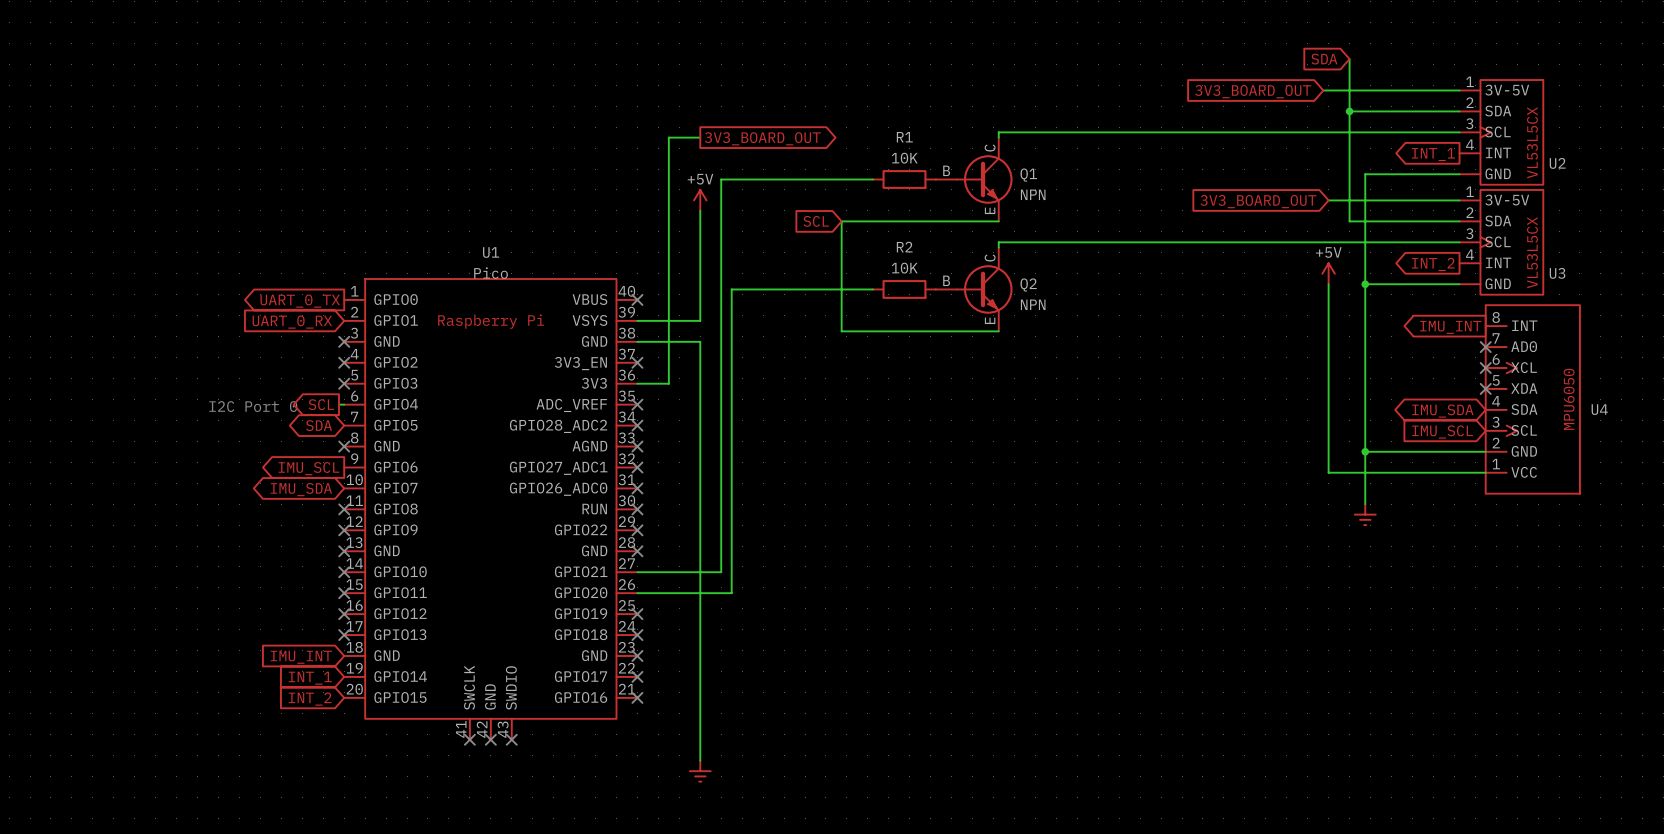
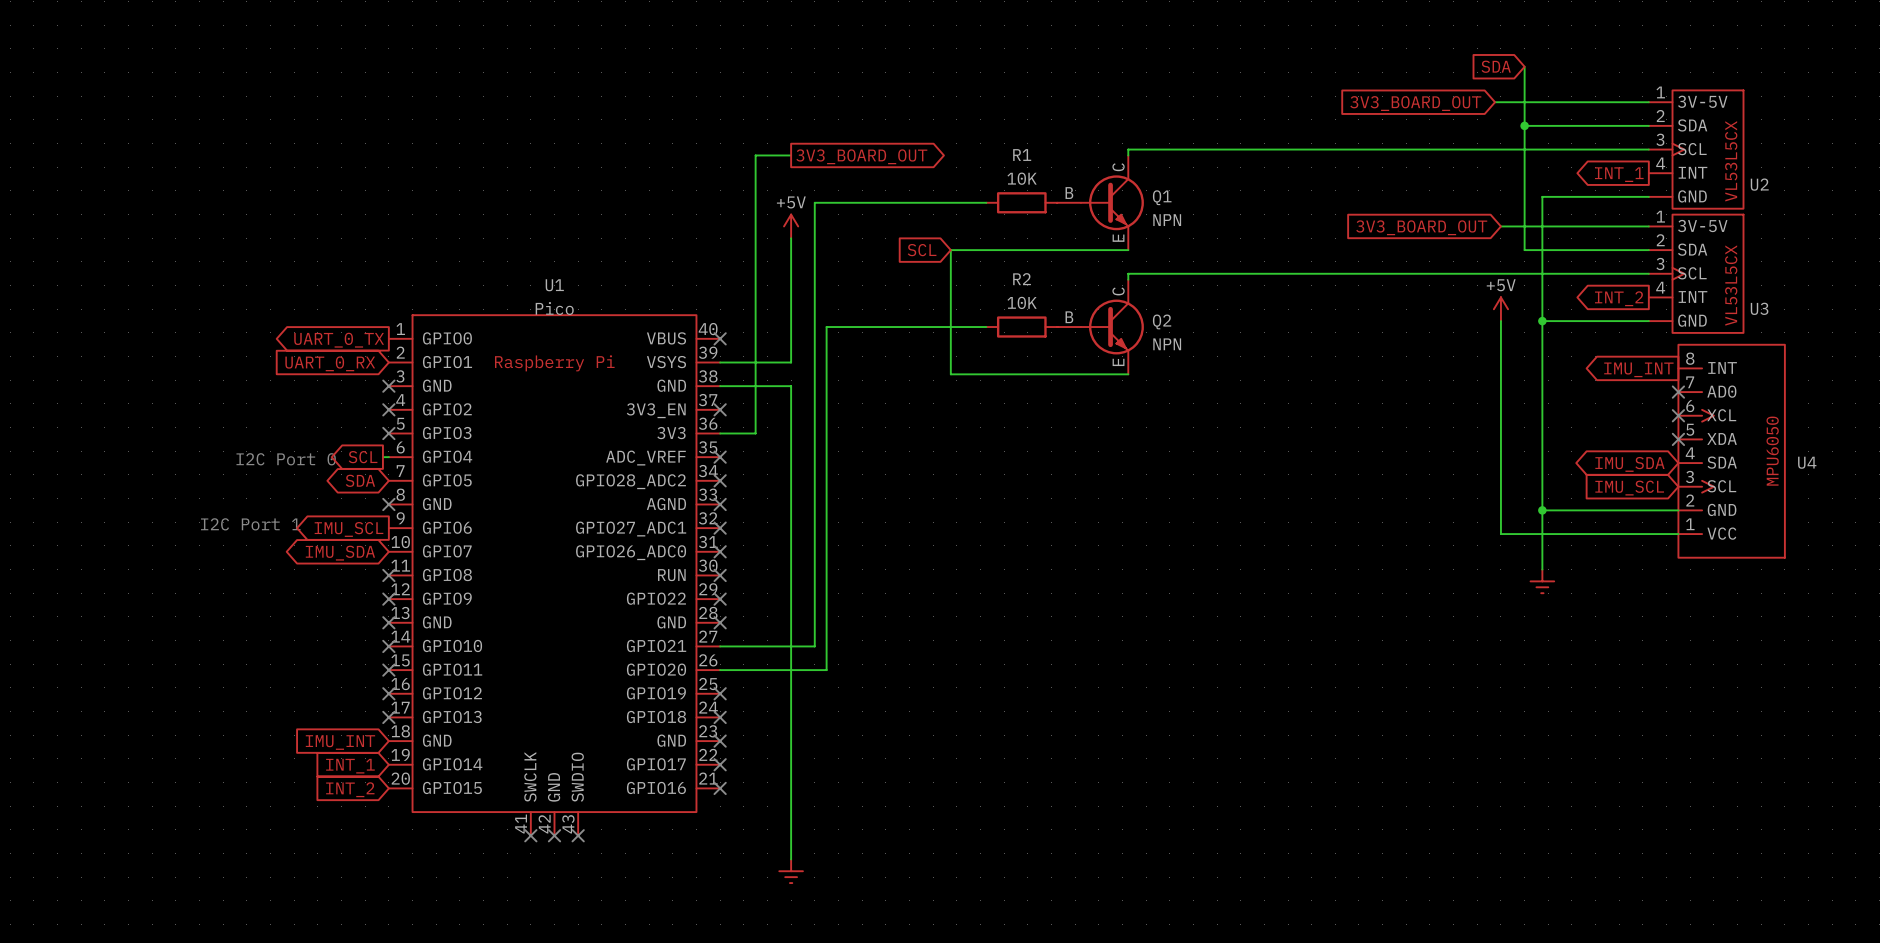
text: none -> I2C Port 1 (250, 524)

